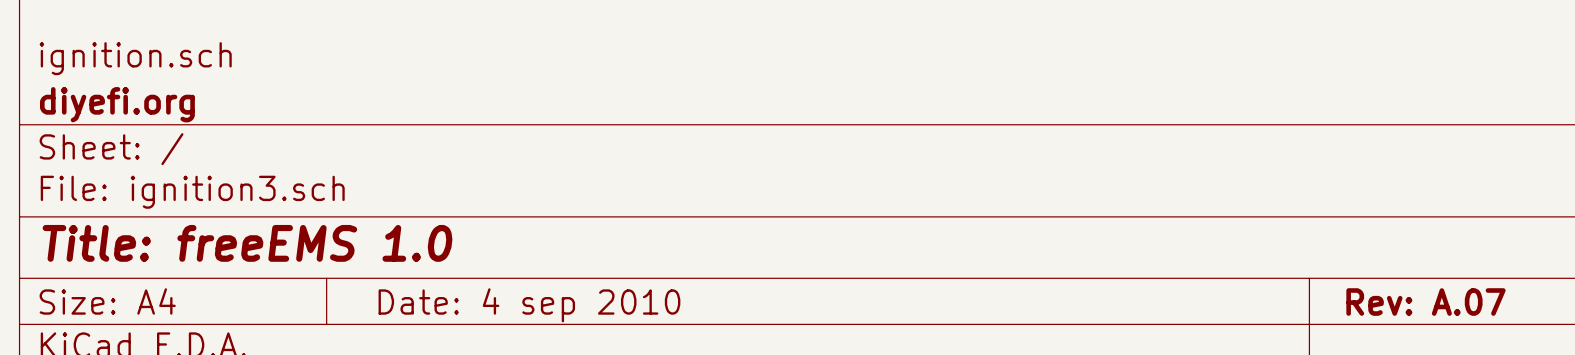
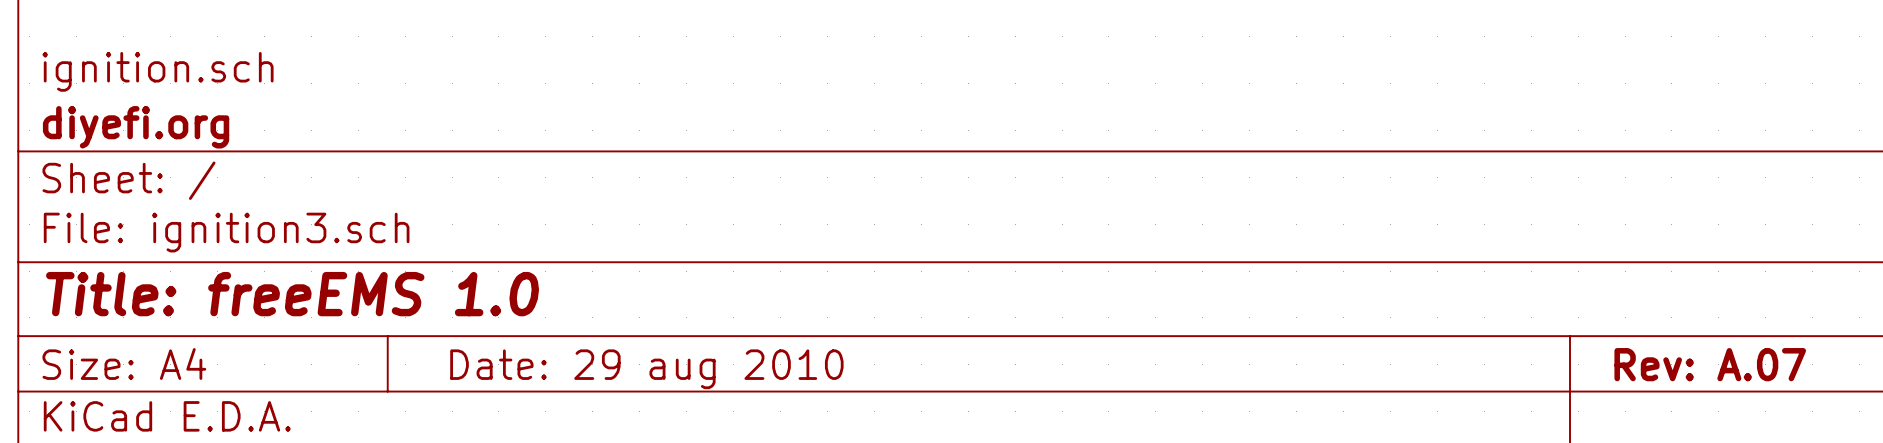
title block: Date: 4 sep 2010 (529, 305) -> Date: 29 aug 2010 (646, 369)

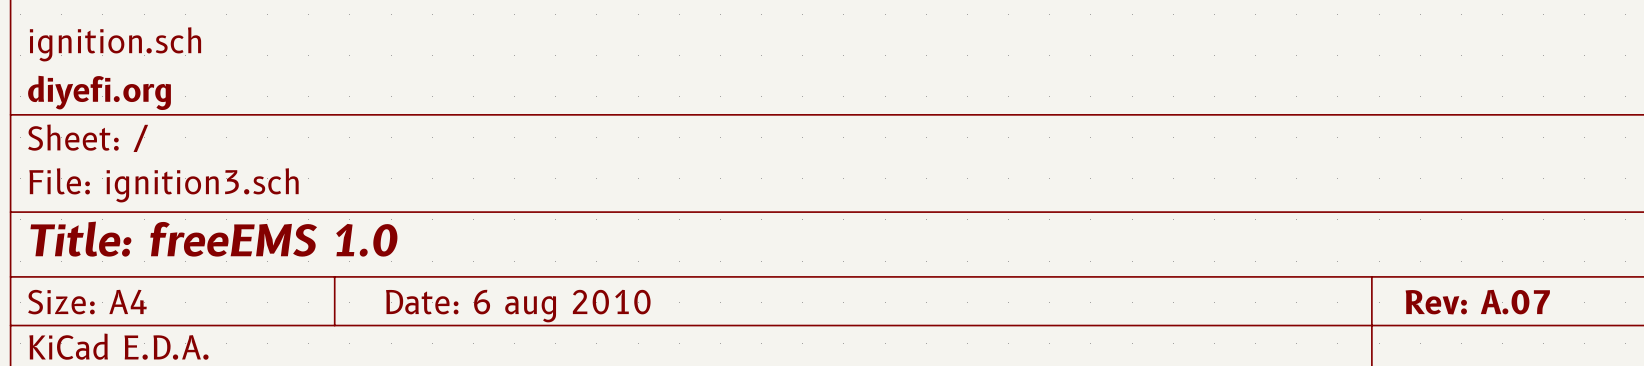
title block: Date: 29 aug 2010 (646, 369) -> Date: 6 aug 2010 (518, 306)

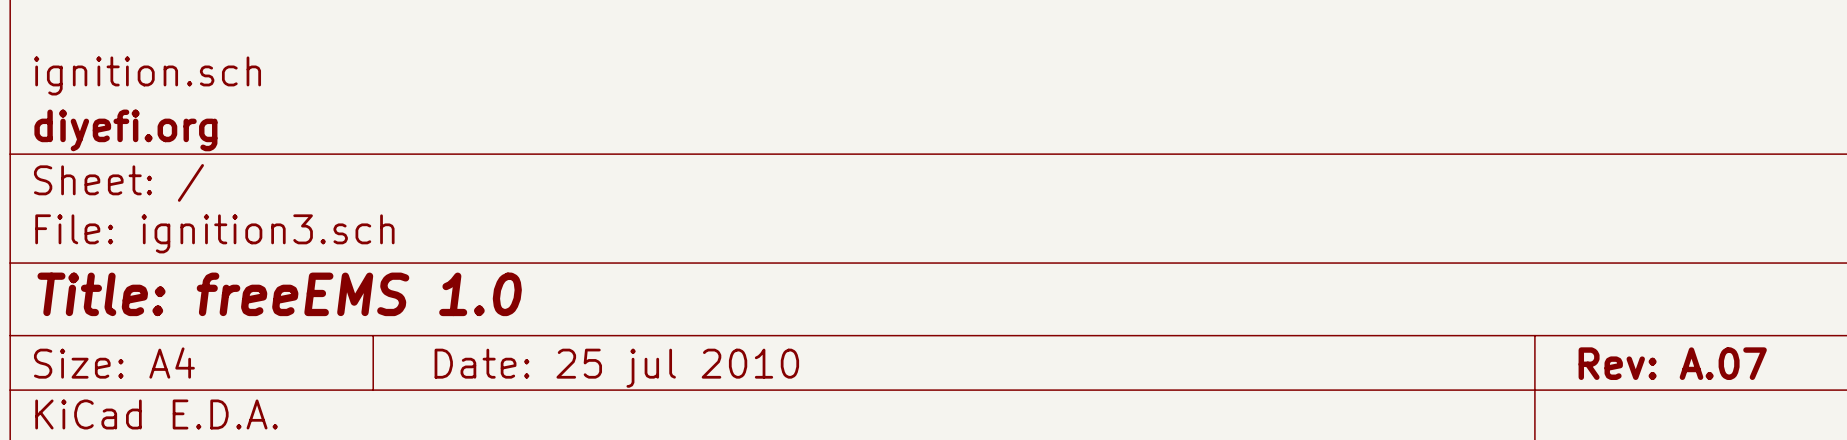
title block: Date: 6 aug 2010 (518, 306) -> Date: 25 jul 2010 (616, 368)

